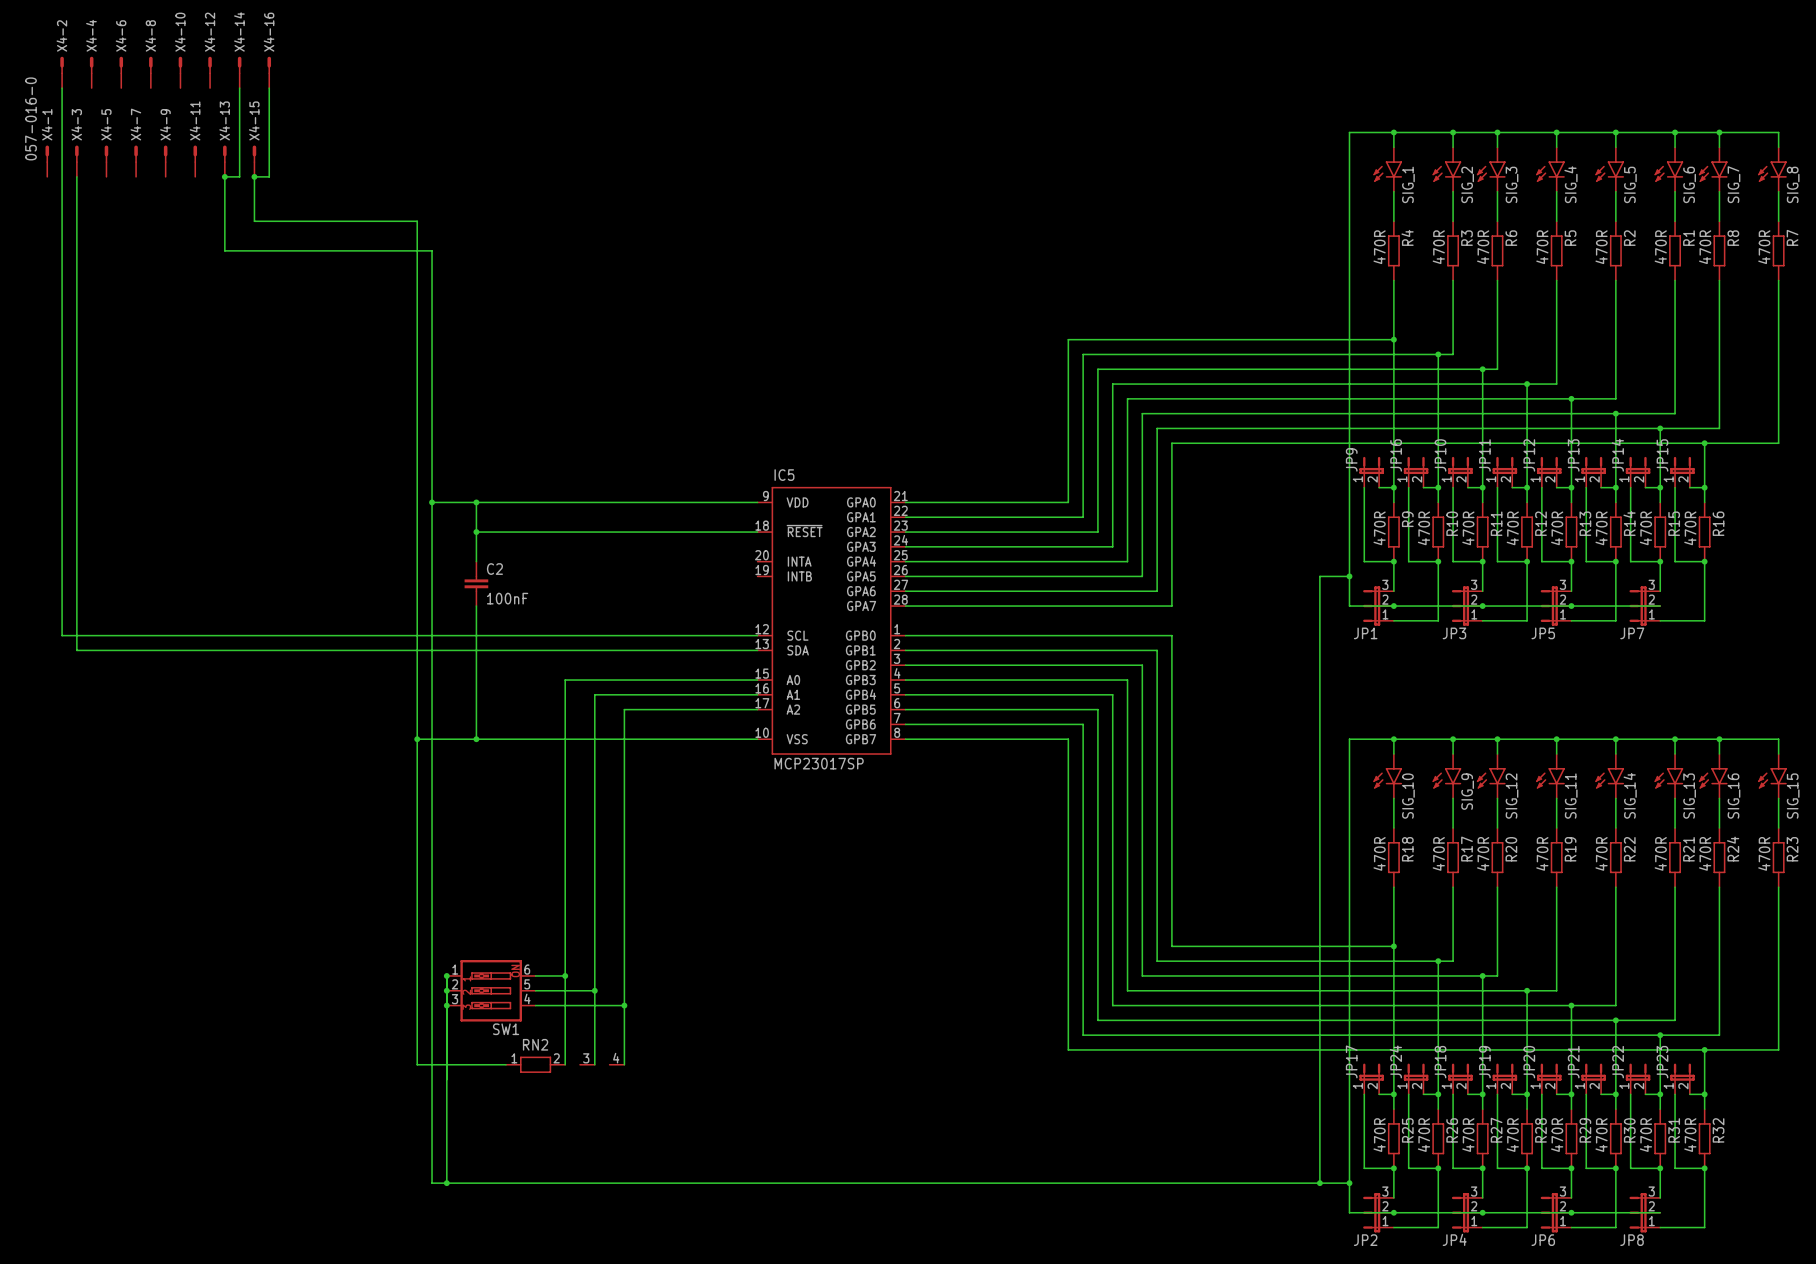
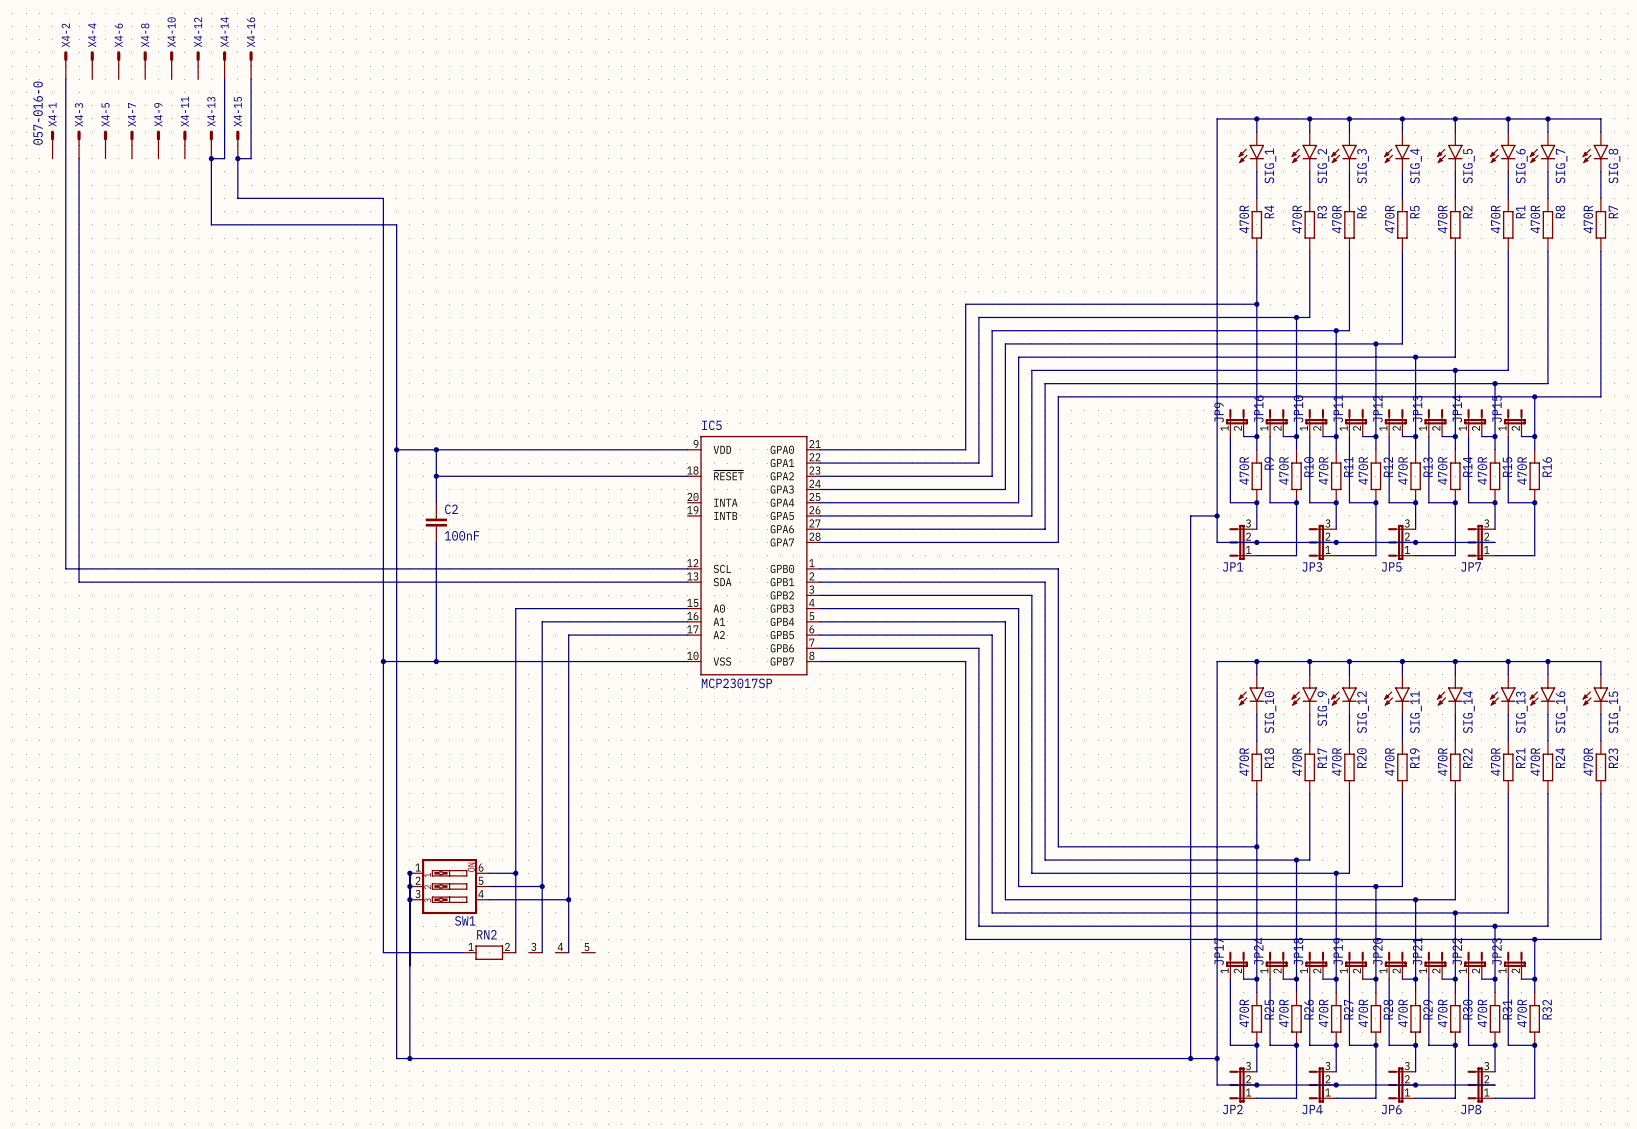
RN2 symbol: [506, 1056, 625, 1073] -> [462, 945, 596, 960]

